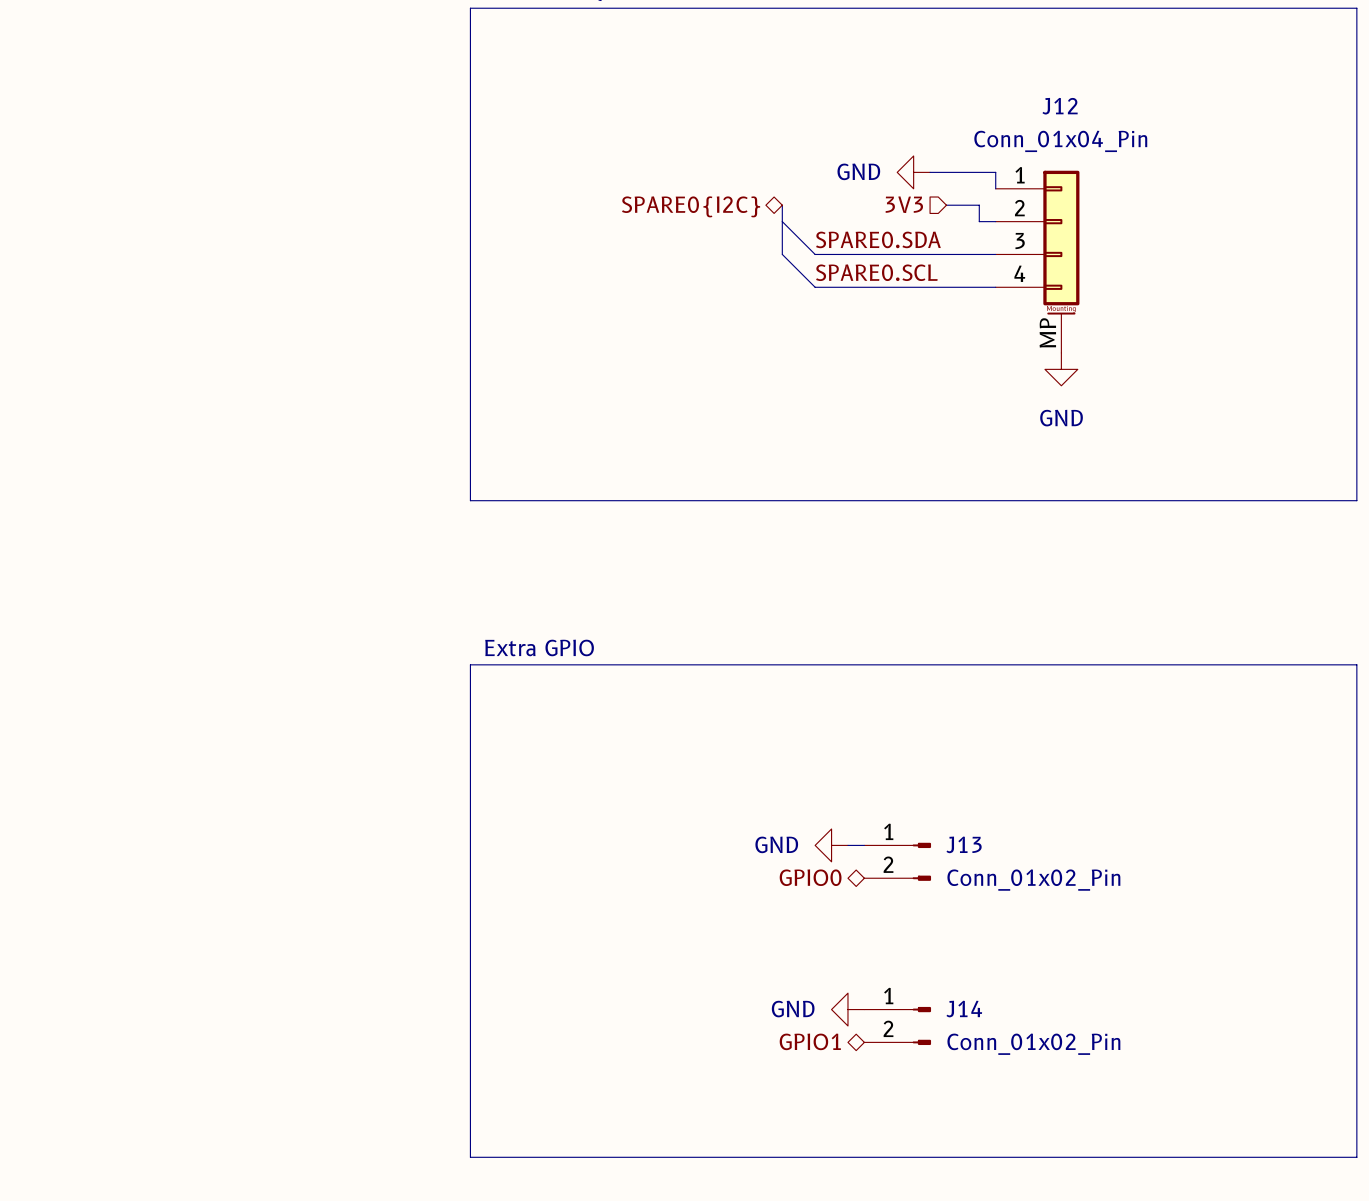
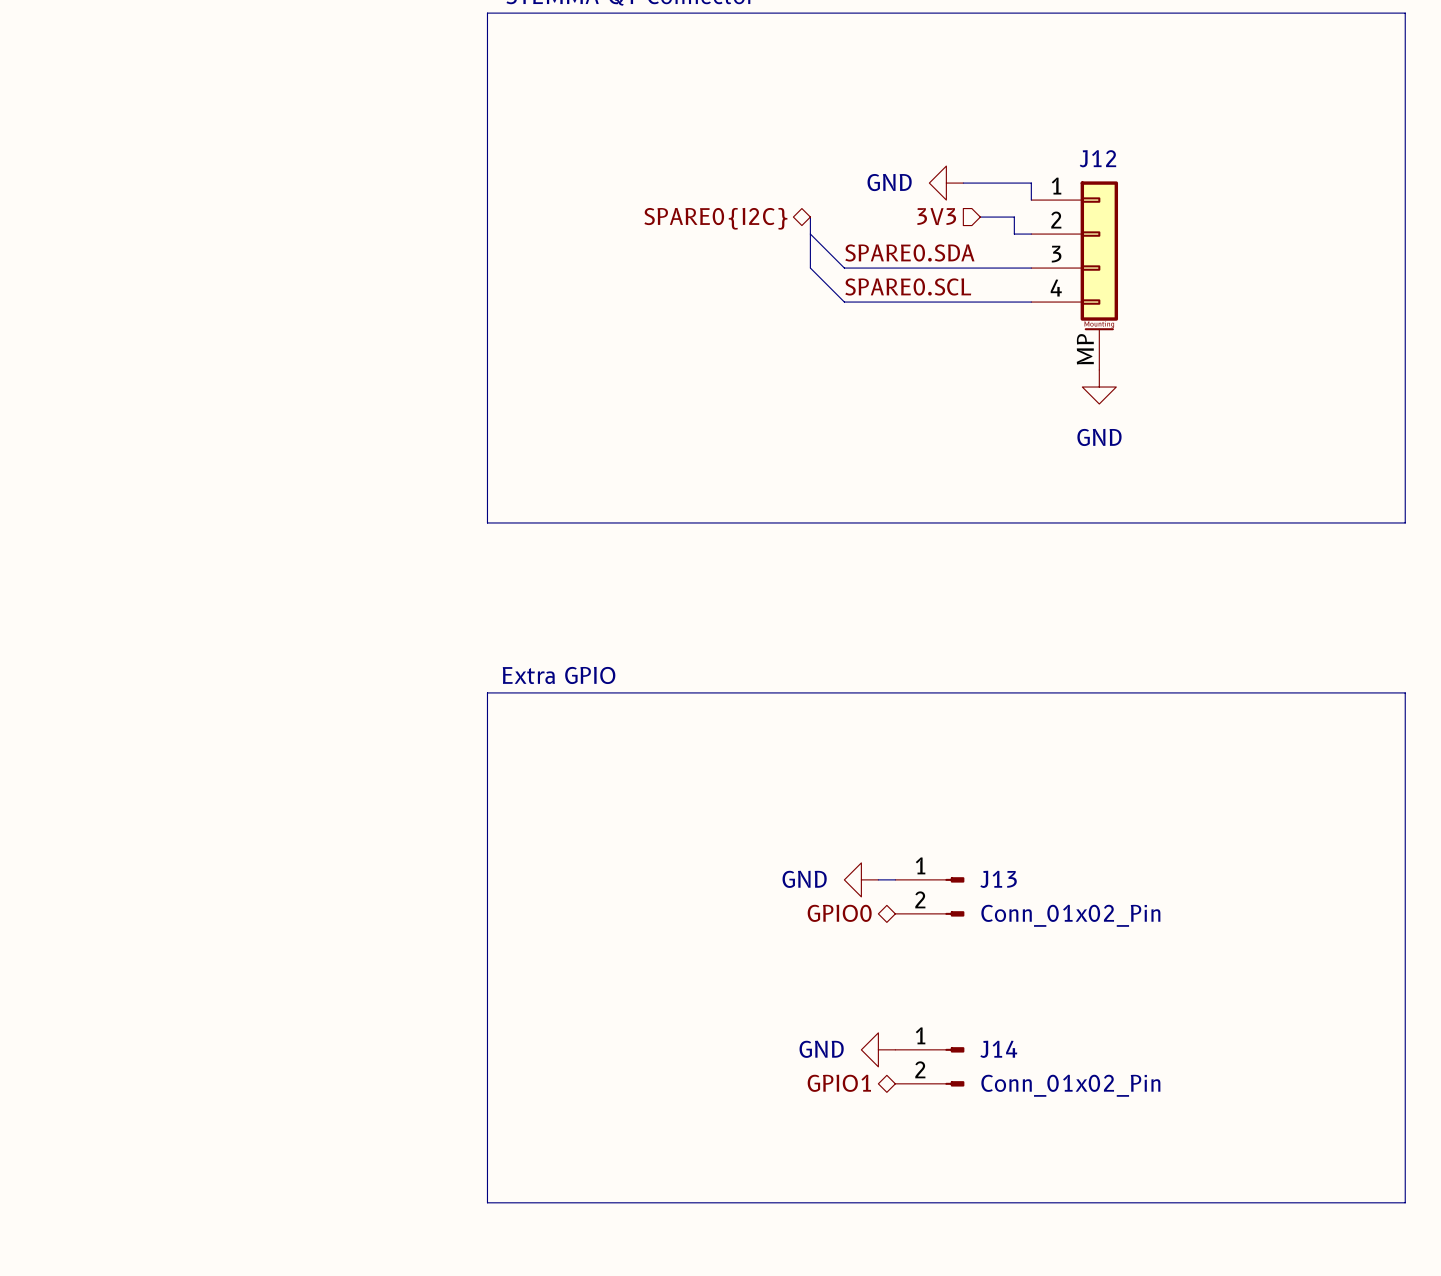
J12 name position: J12 (1060, 106) -> J12 (1097, 158)
J12 value: Conn_01x04_Pin (1060, 141) -> none

